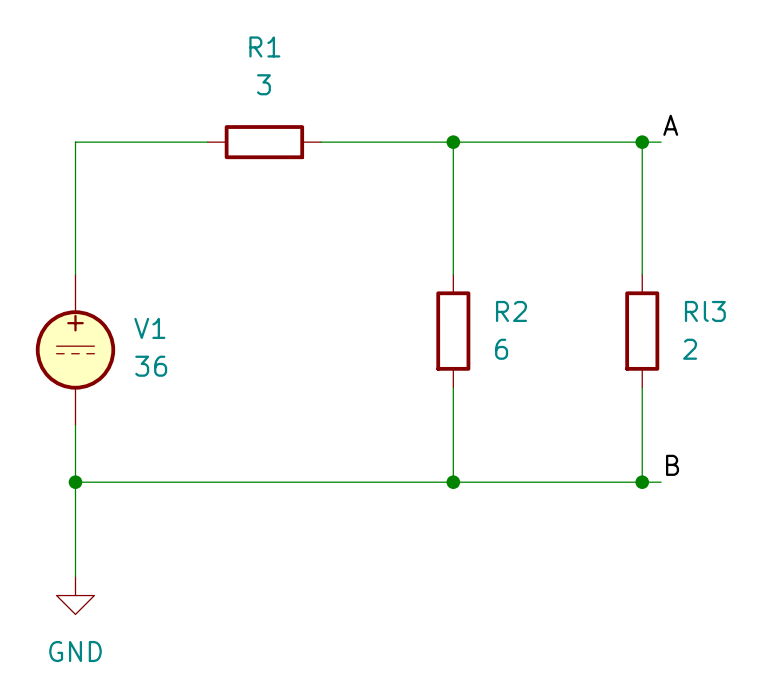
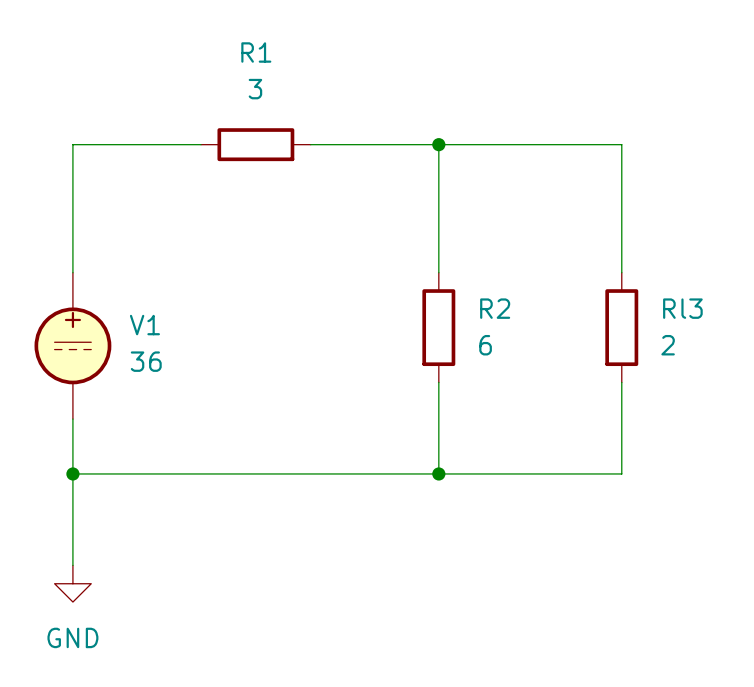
label: A (670, 125) -> none
wire: (642, 142) (661, 142) -> none
junction: (642, 142) -> none
label: B (672, 465) -> none
wire: (642, 482) (661, 482) -> none
junction: (642, 482) -> none

